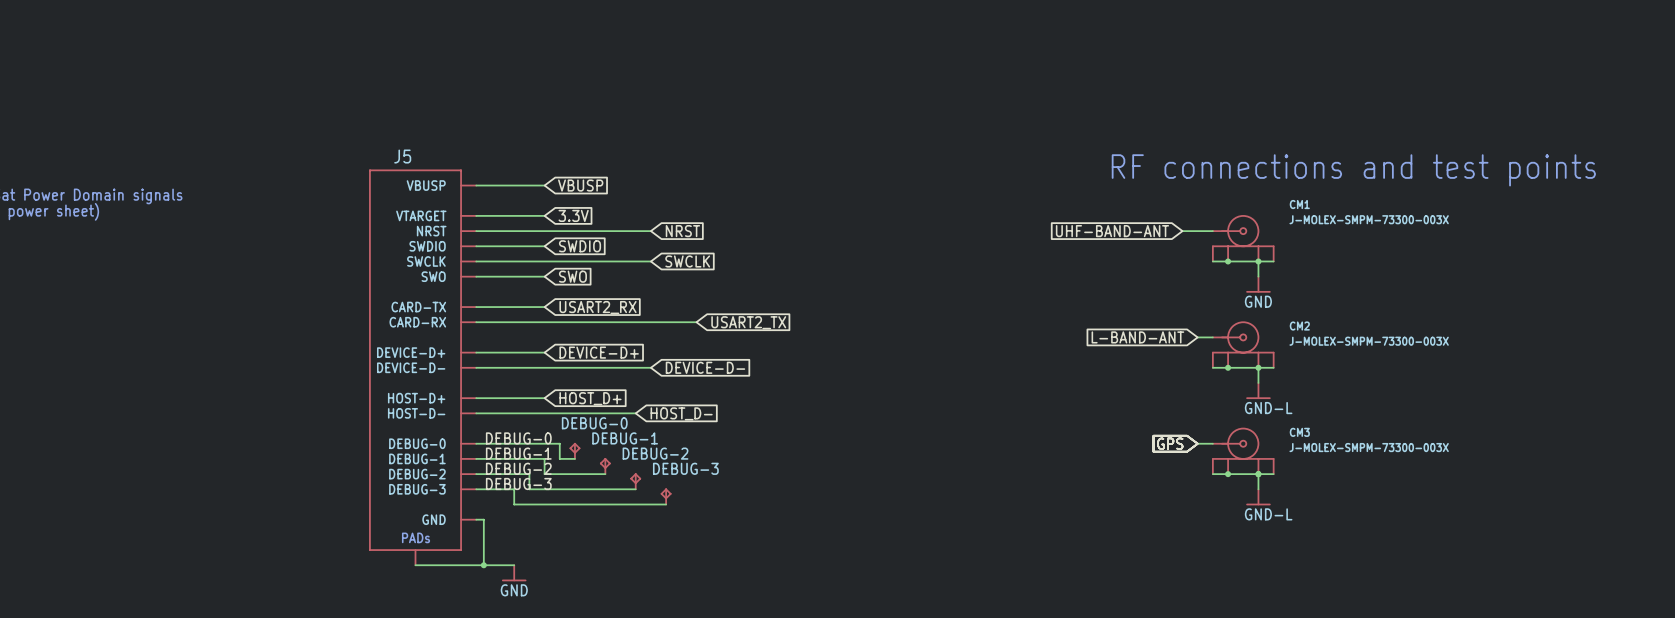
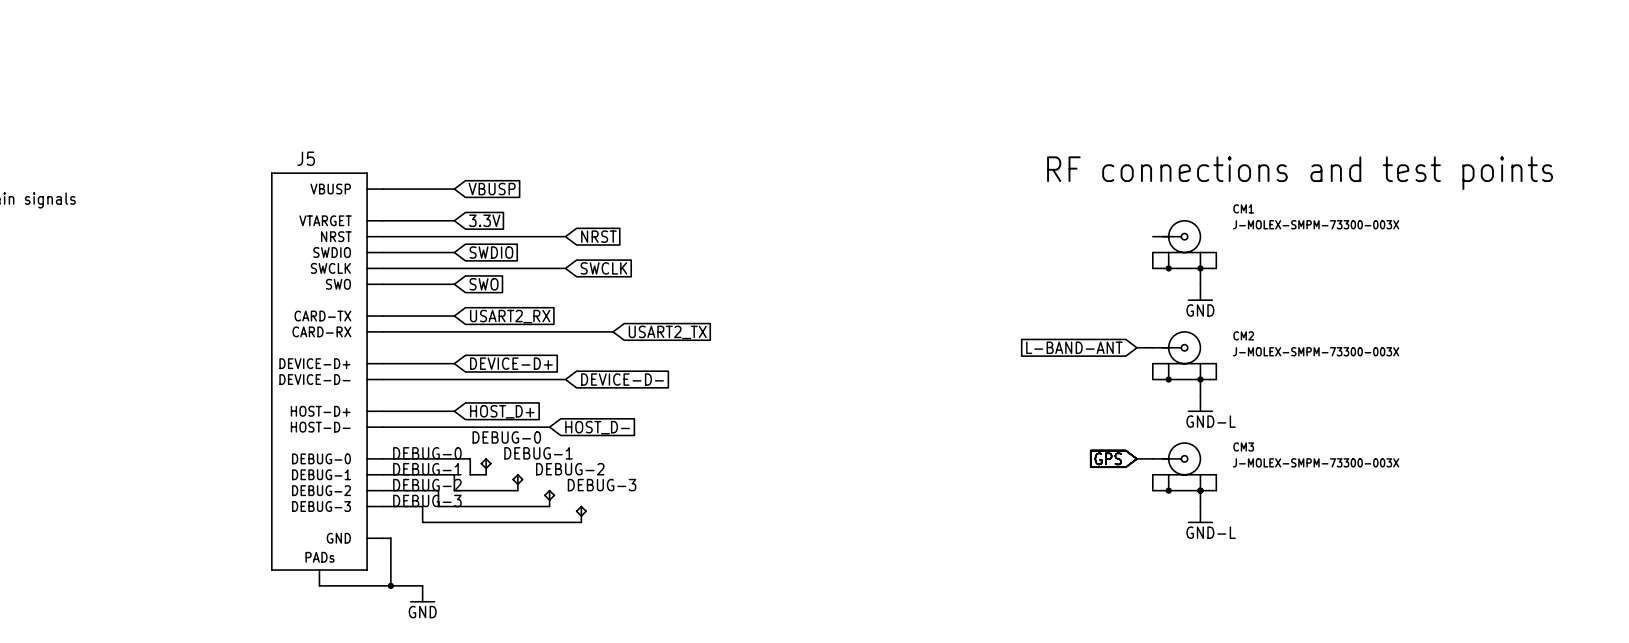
global label: UHF-BAND-ANT (1112, 231) -> none
wire: (1182, 231) (1212, 231) -> none

